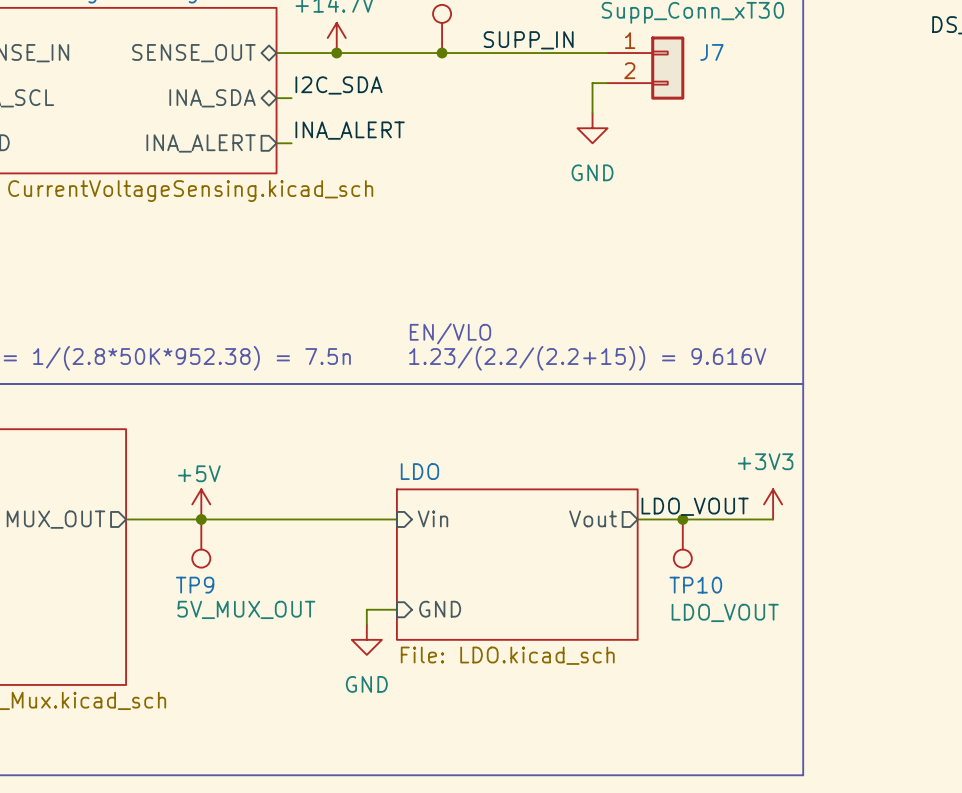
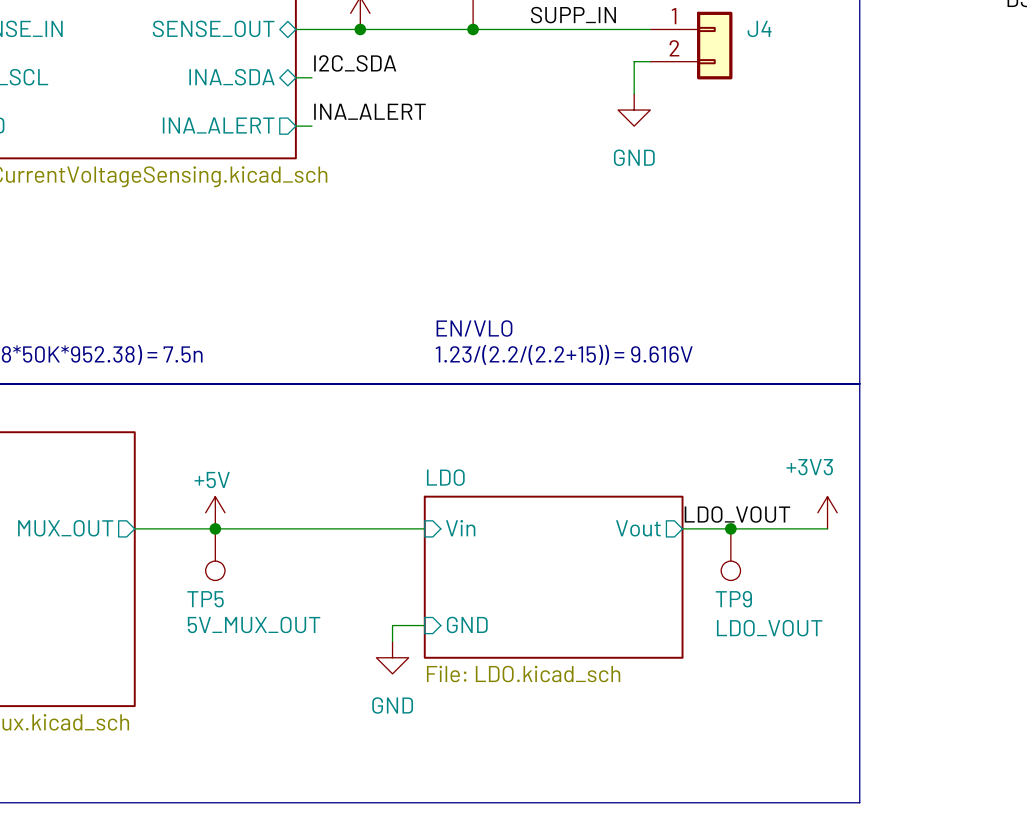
J7 name: J7 (711, 52) -> J4 (759, 28)
TP9 name: TP9 (195, 585) -> TP5 (205, 599)
TP10 name: TP10 (695, 585) -> TP9 (733, 599)

